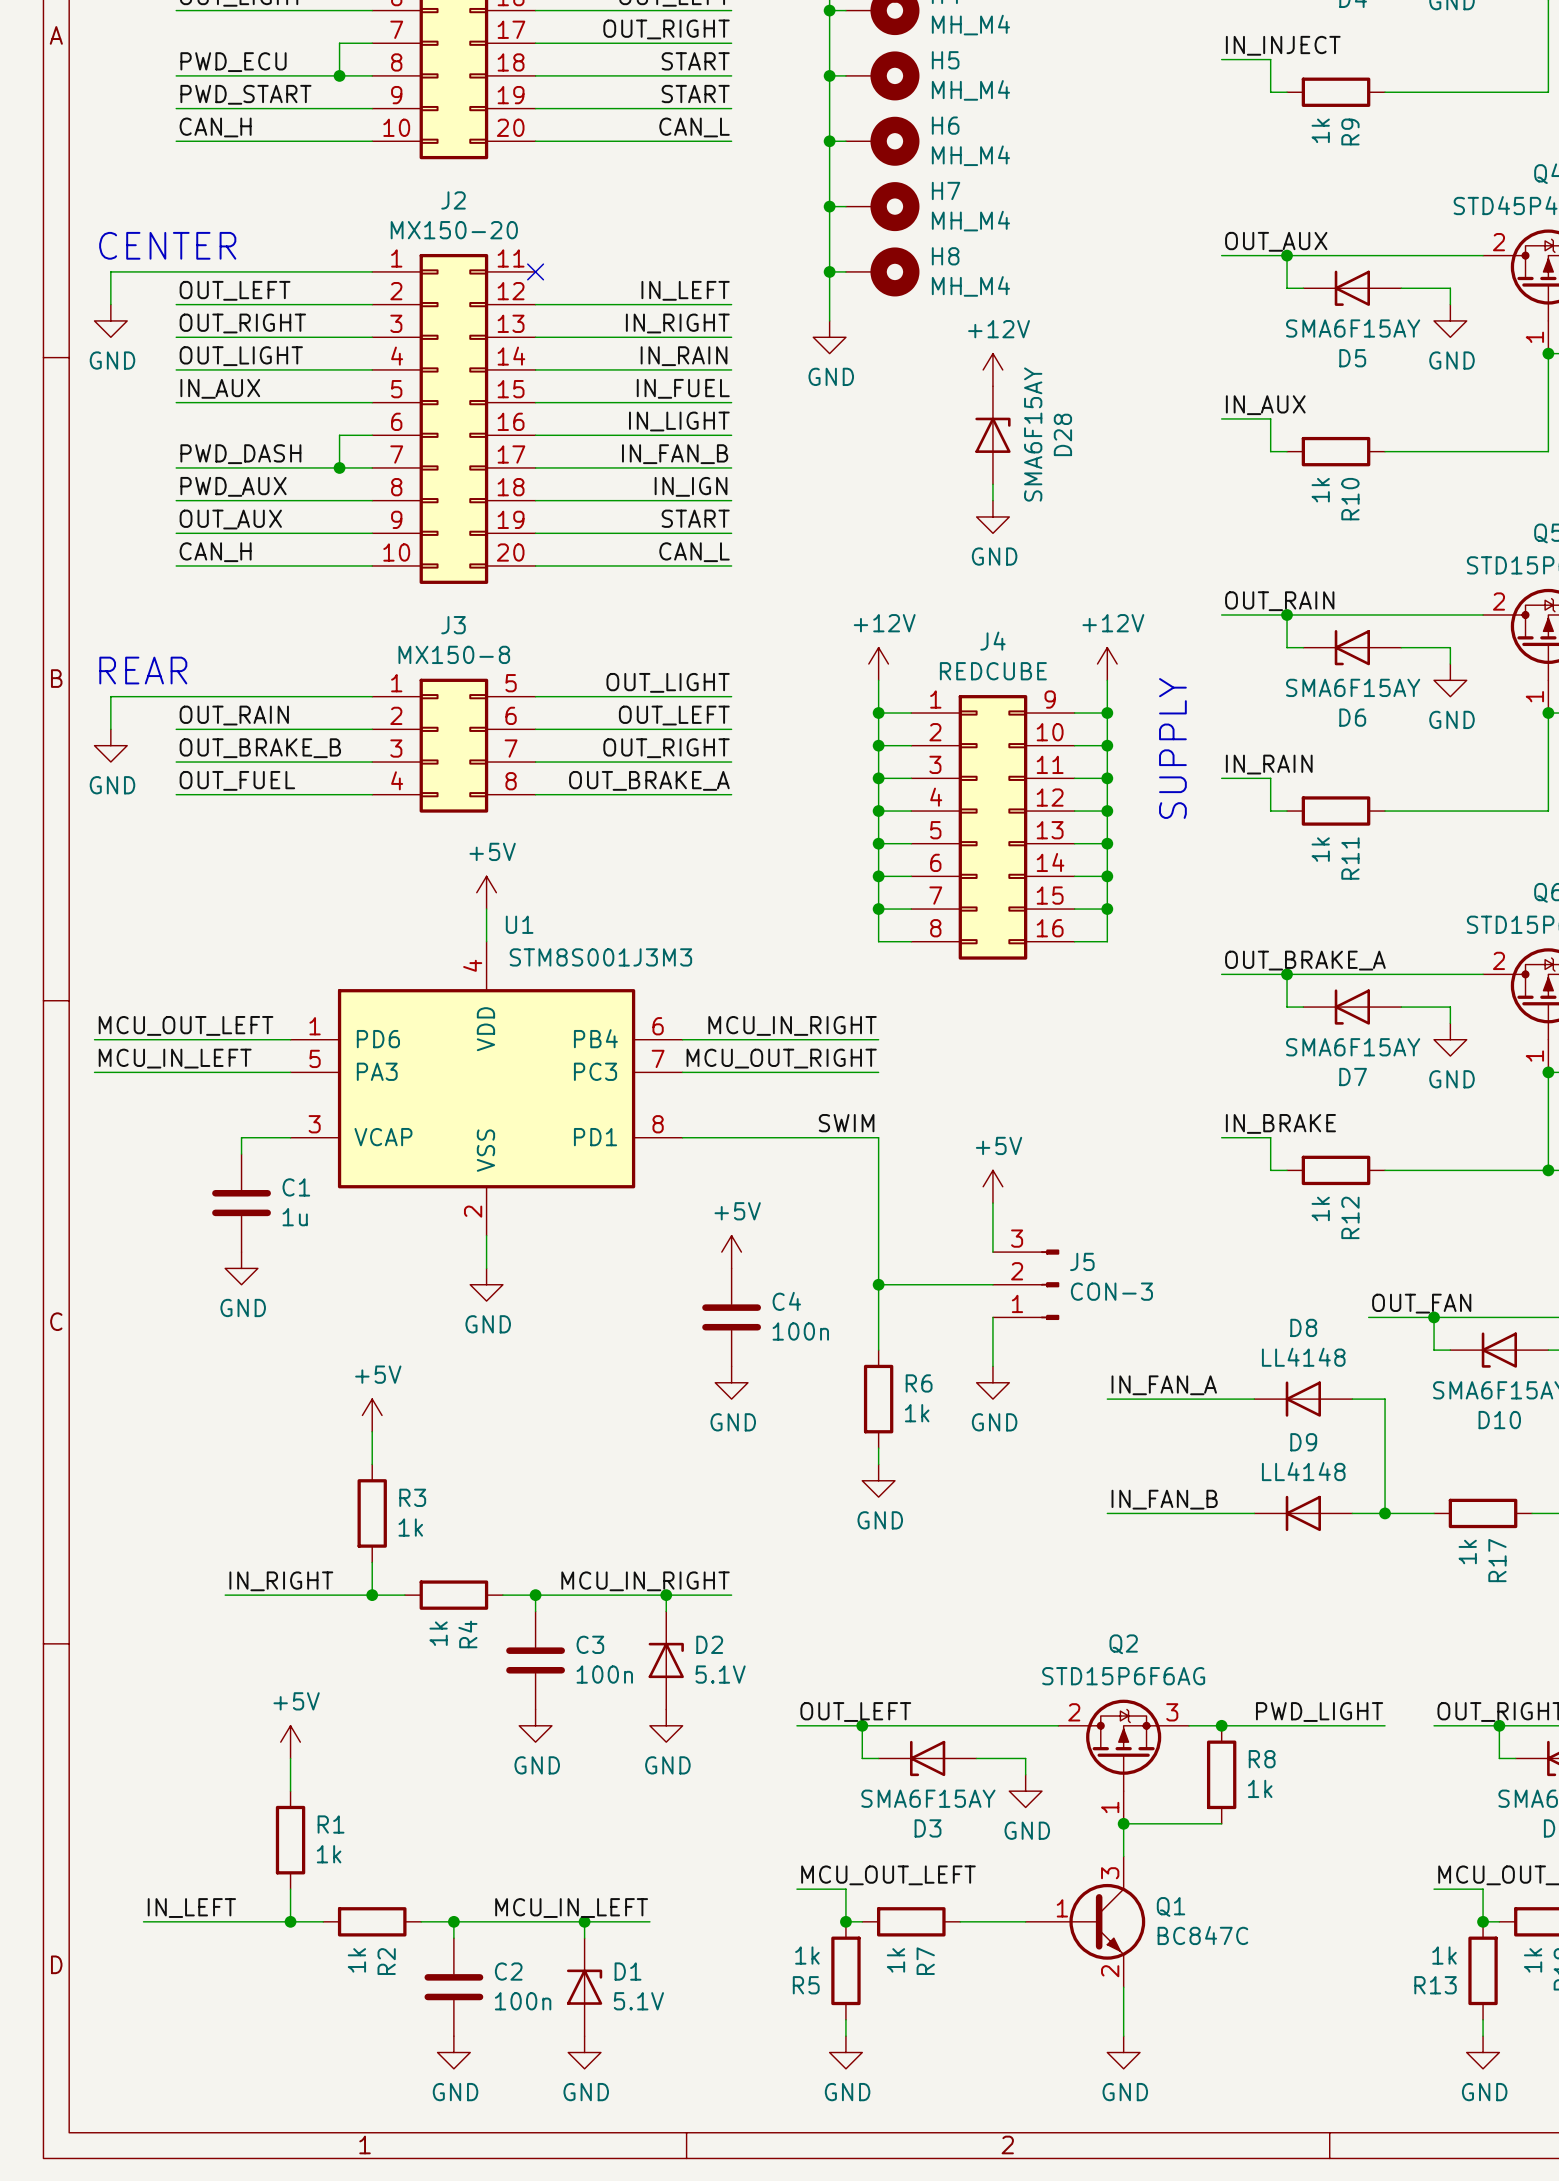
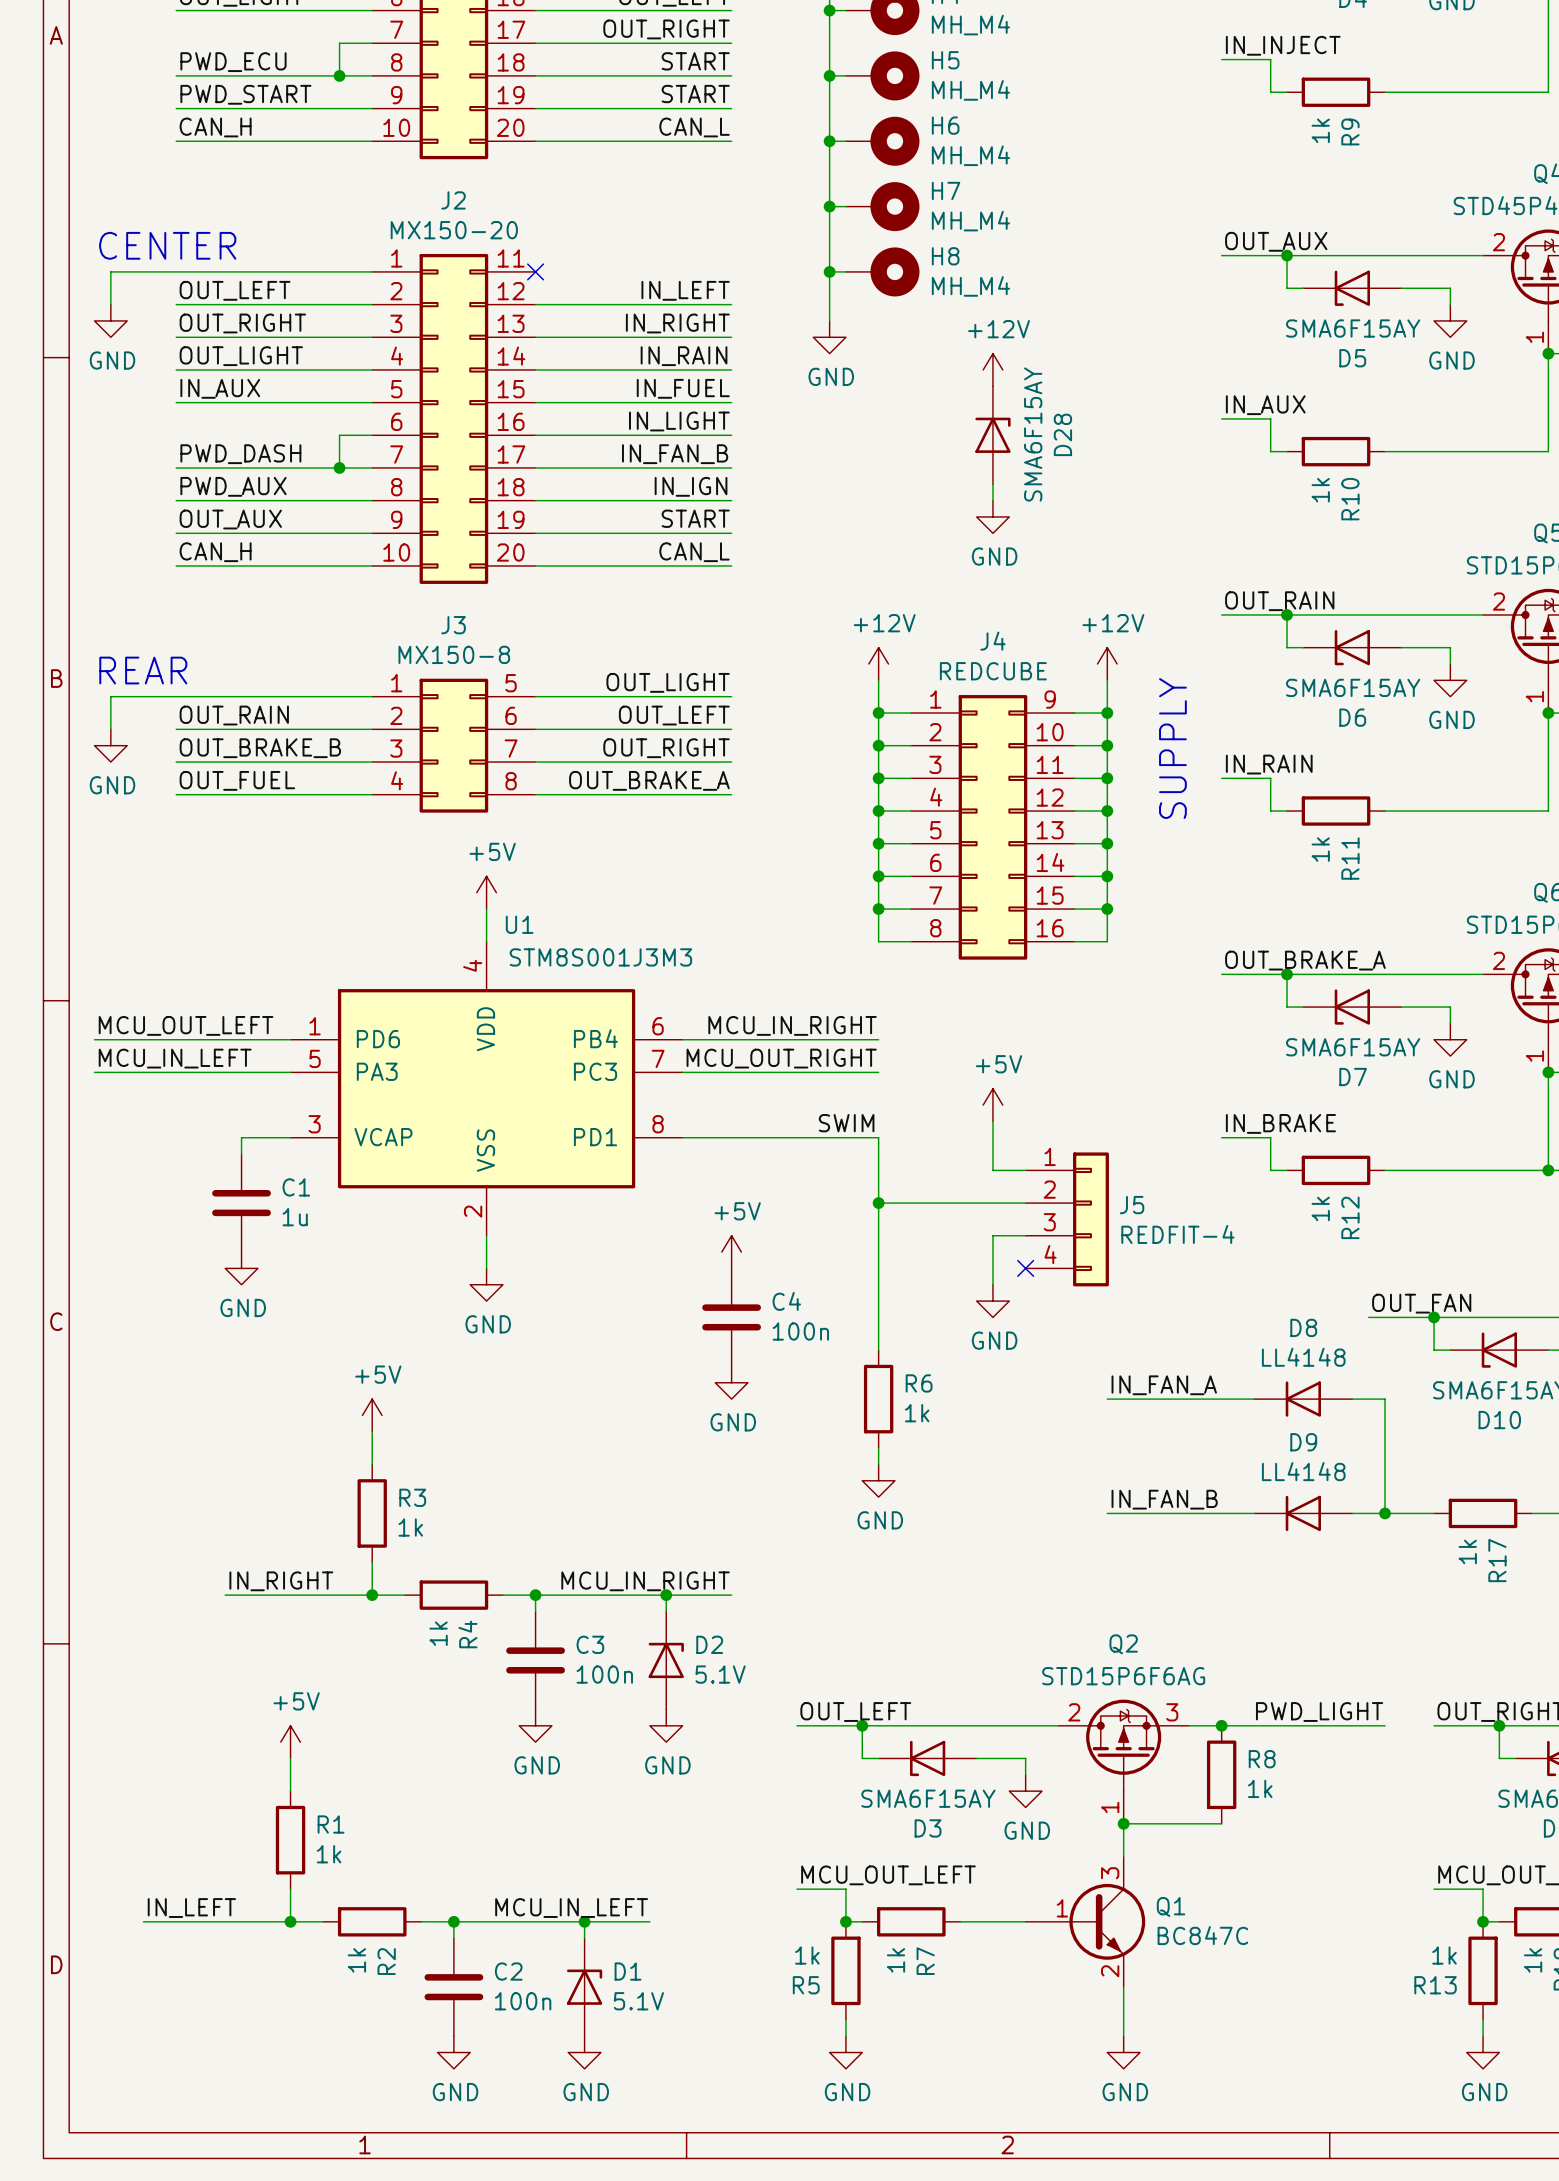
wire: none -> (992, 1121) (992, 1170) (1025, 1170)
power symbol position: +5V (992, 1186) -> +5V (992, 1105)
wire: none -> (878, 1203) (1025, 1203)
junction: none -> (878, 1203)
wire: (992, 1203) (992, 1235) -> (1025, 1235) (992, 1235)
J5 symbol: [992, 1249, 1060, 1321] -> [1025, 1152, 1109, 1287]
no-connect mark: none -> (1025, 1268)
wire: (878, 1284) (992, 1284) -> (992, 1252) (992, 1284)
junction: (878, 1284) -> none
J5 value: CON-3 (1111, 1291) -> REDFIT-4 (1177, 1234)
wire: (992, 1317) (992, 1366) -> none
power symbol position: GND (992, 1382) -> GND (992, 1301)

